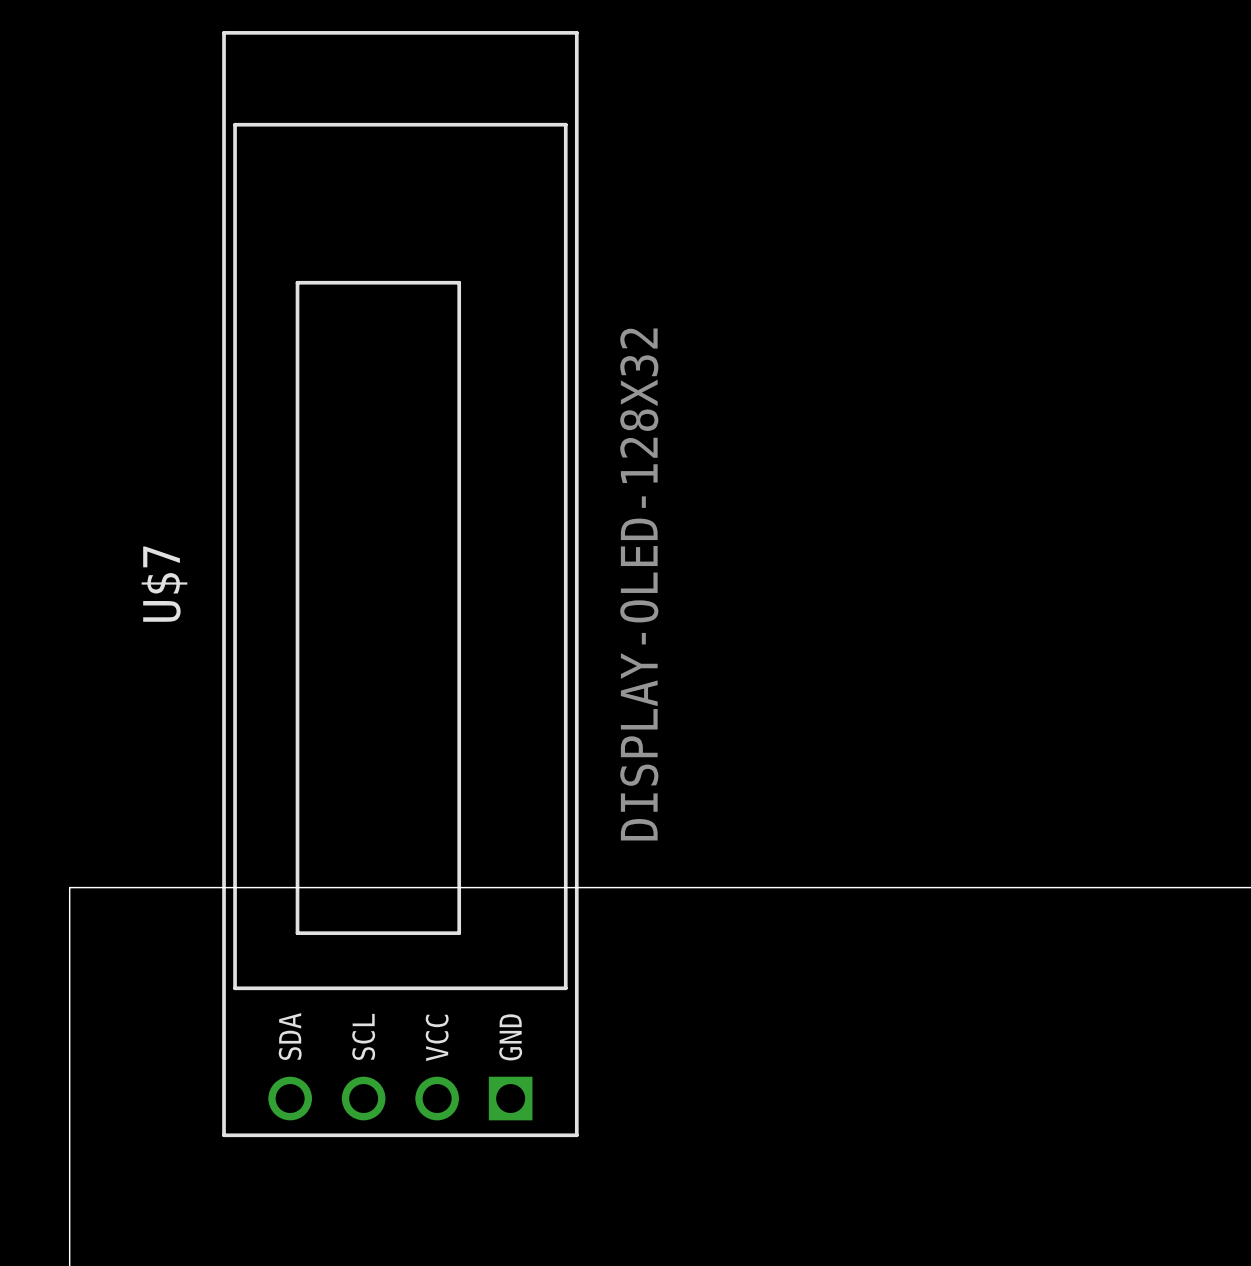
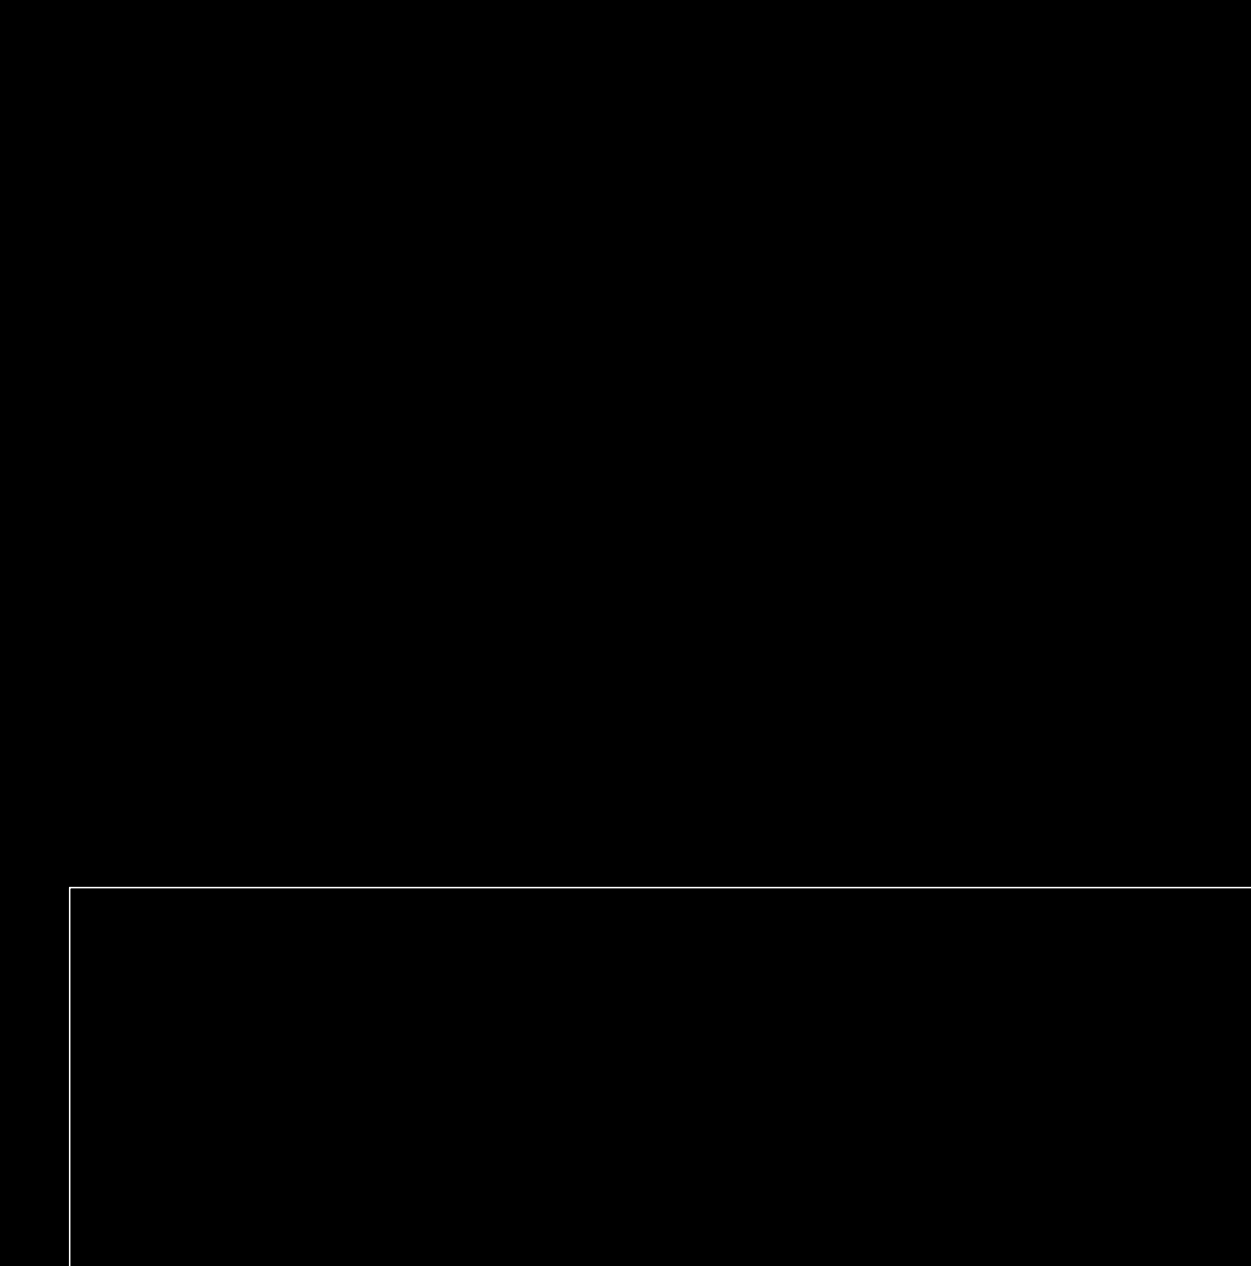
U$7: DISPLAY-OLED-128X32 (400, 584) -> none

